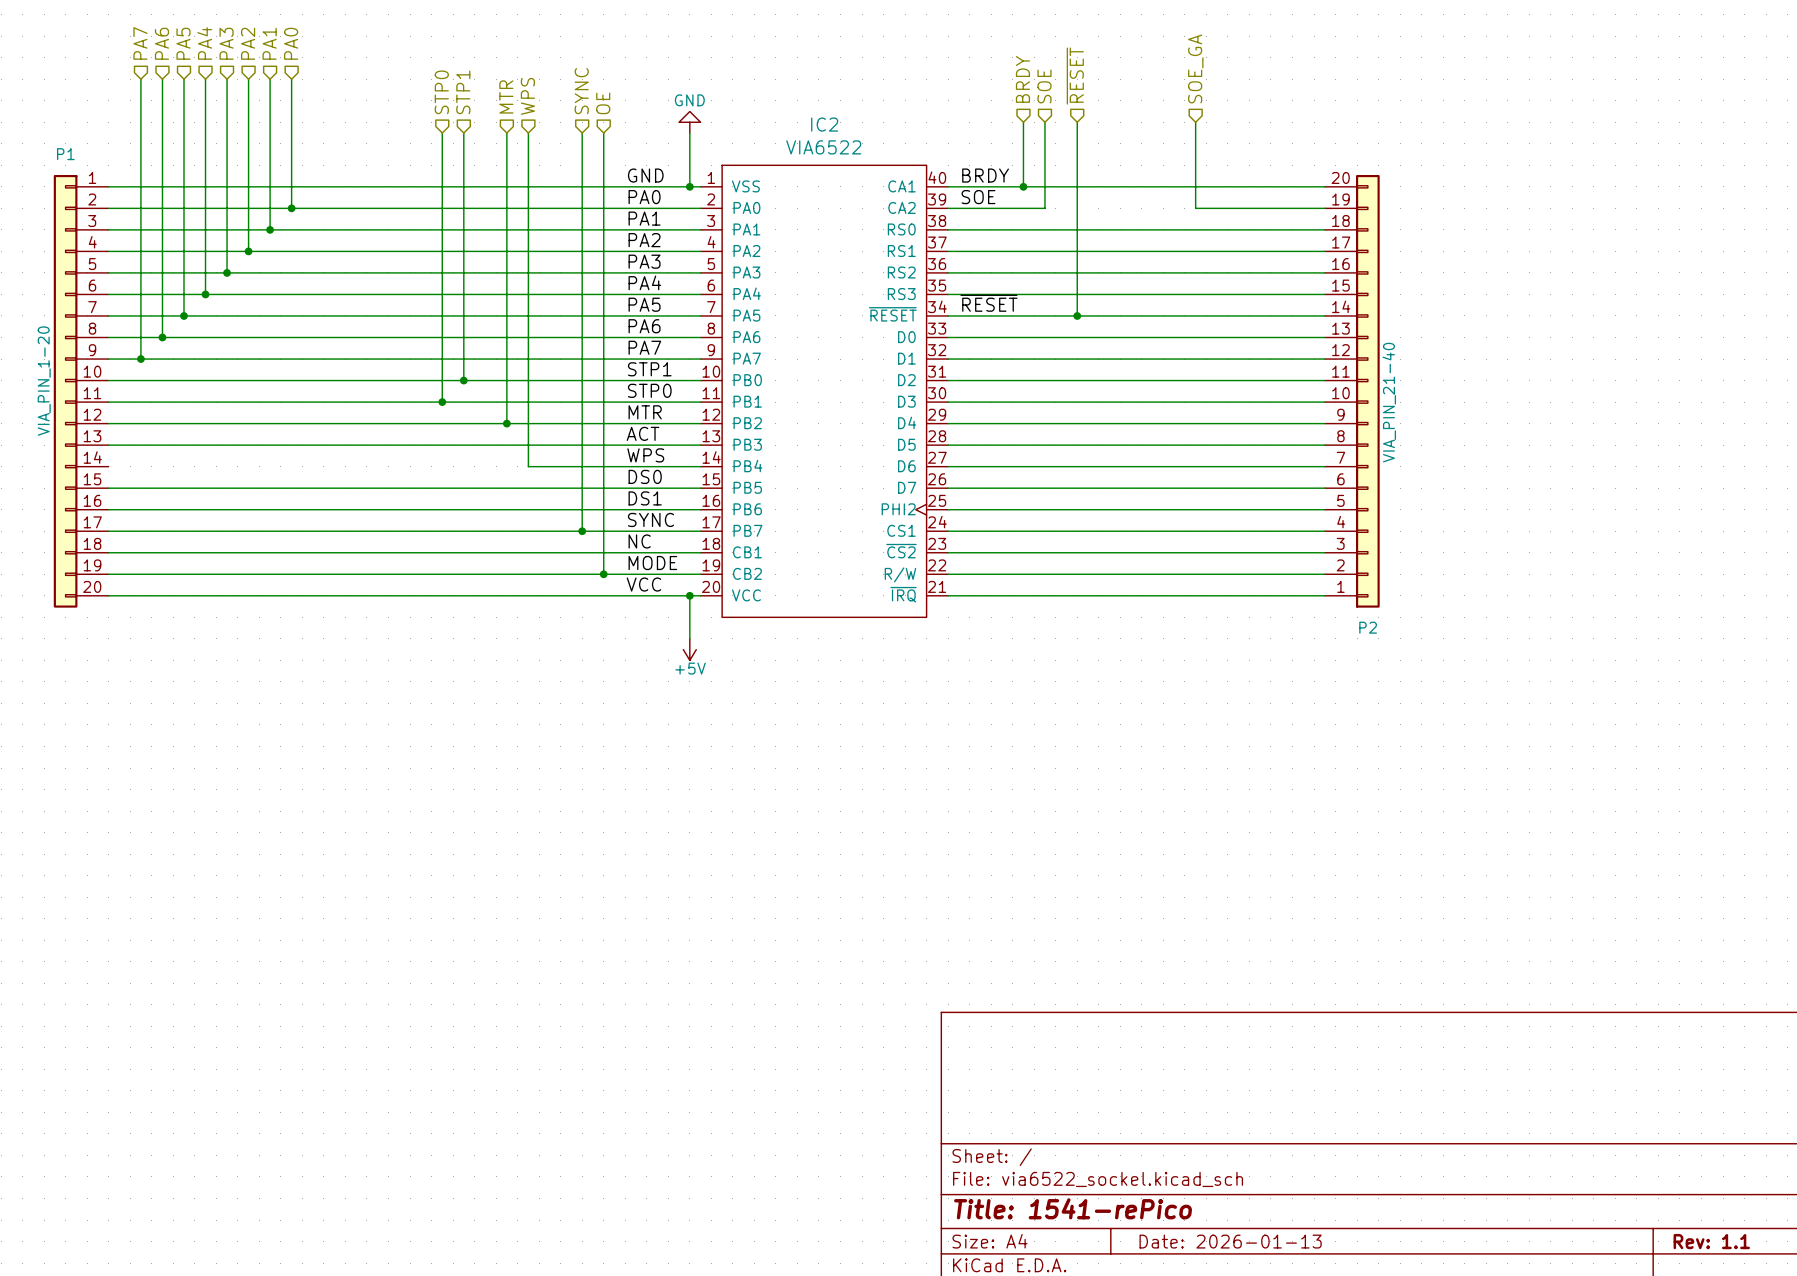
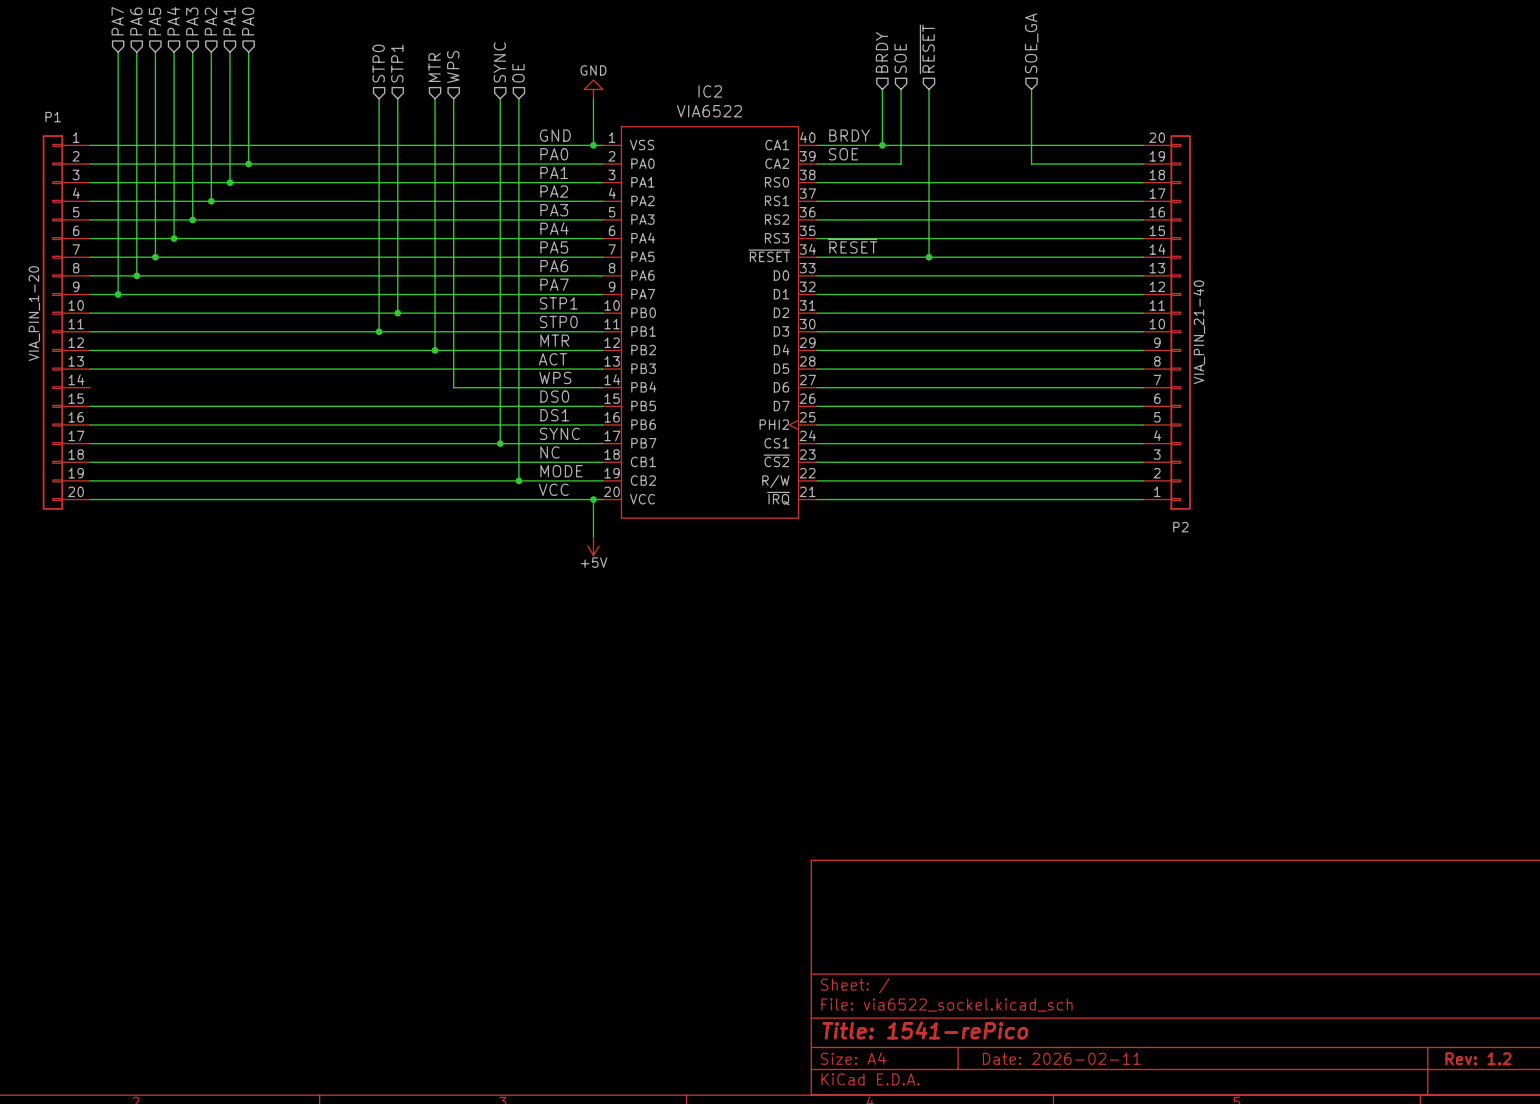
title block: Date: 2026-01-13 (1230, 1241) -> Date: 2026-02-11 (1061, 1058)
title block: Rev: 1.1 (1711, 1241) -> Rev: 1.2 (1478, 1058)

